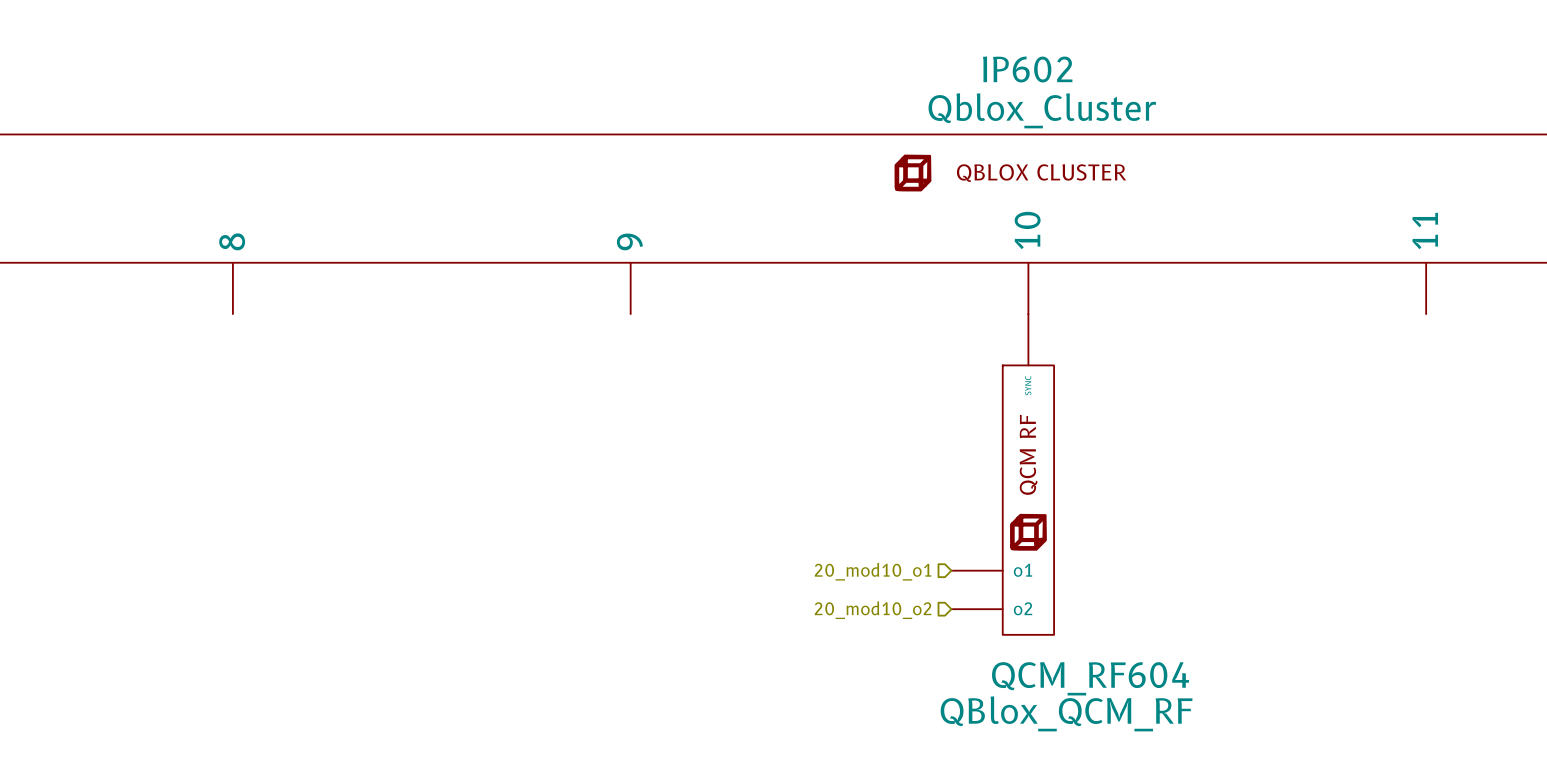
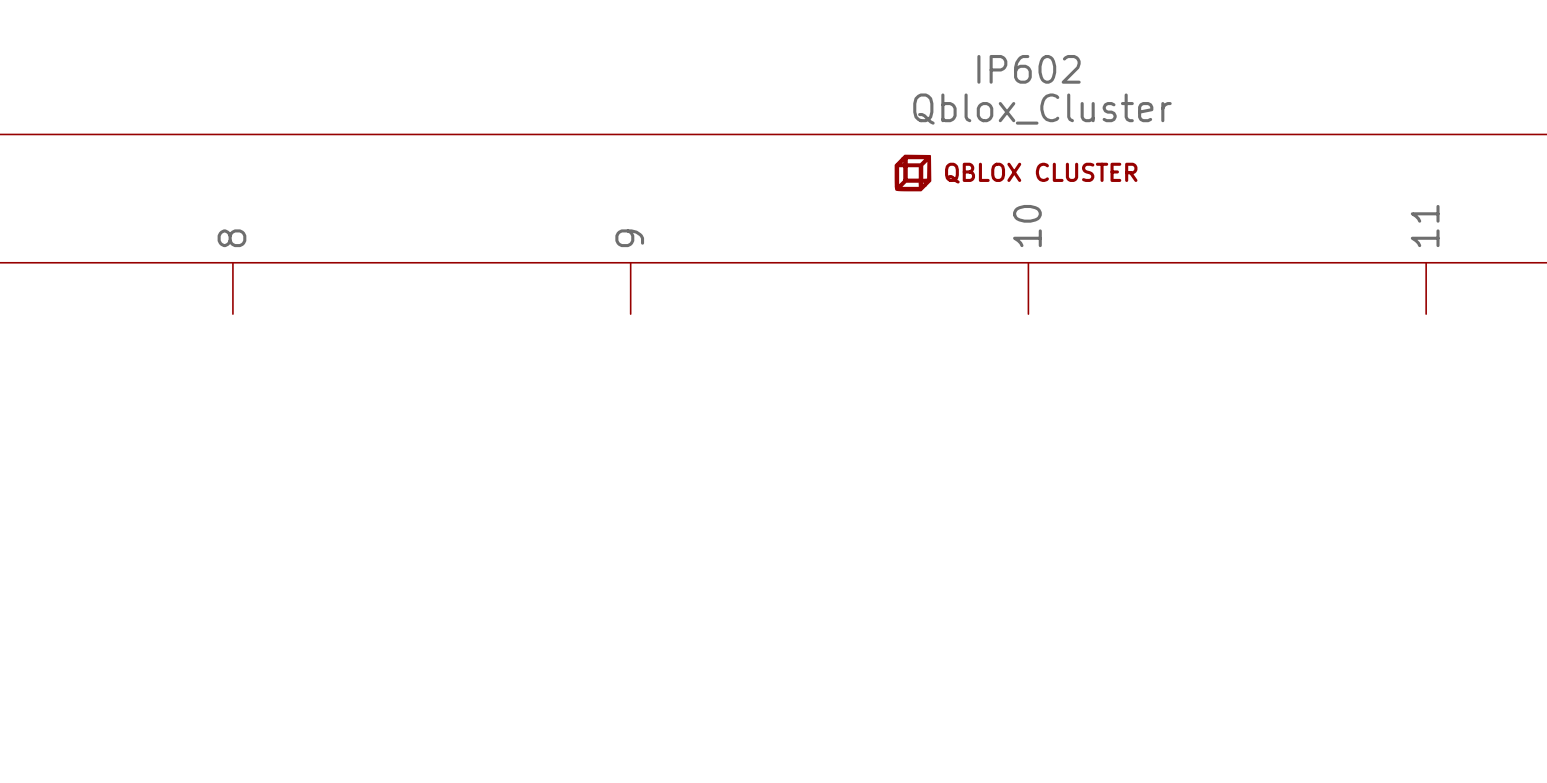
QCM_RF604: QBlox_QCM_RF (1002, 474) -> none
hierarchical label: 20_mod10_o1 (873, 571) -> none
hierarchical label: 20_mod10_o2 (873, 610) -> none

